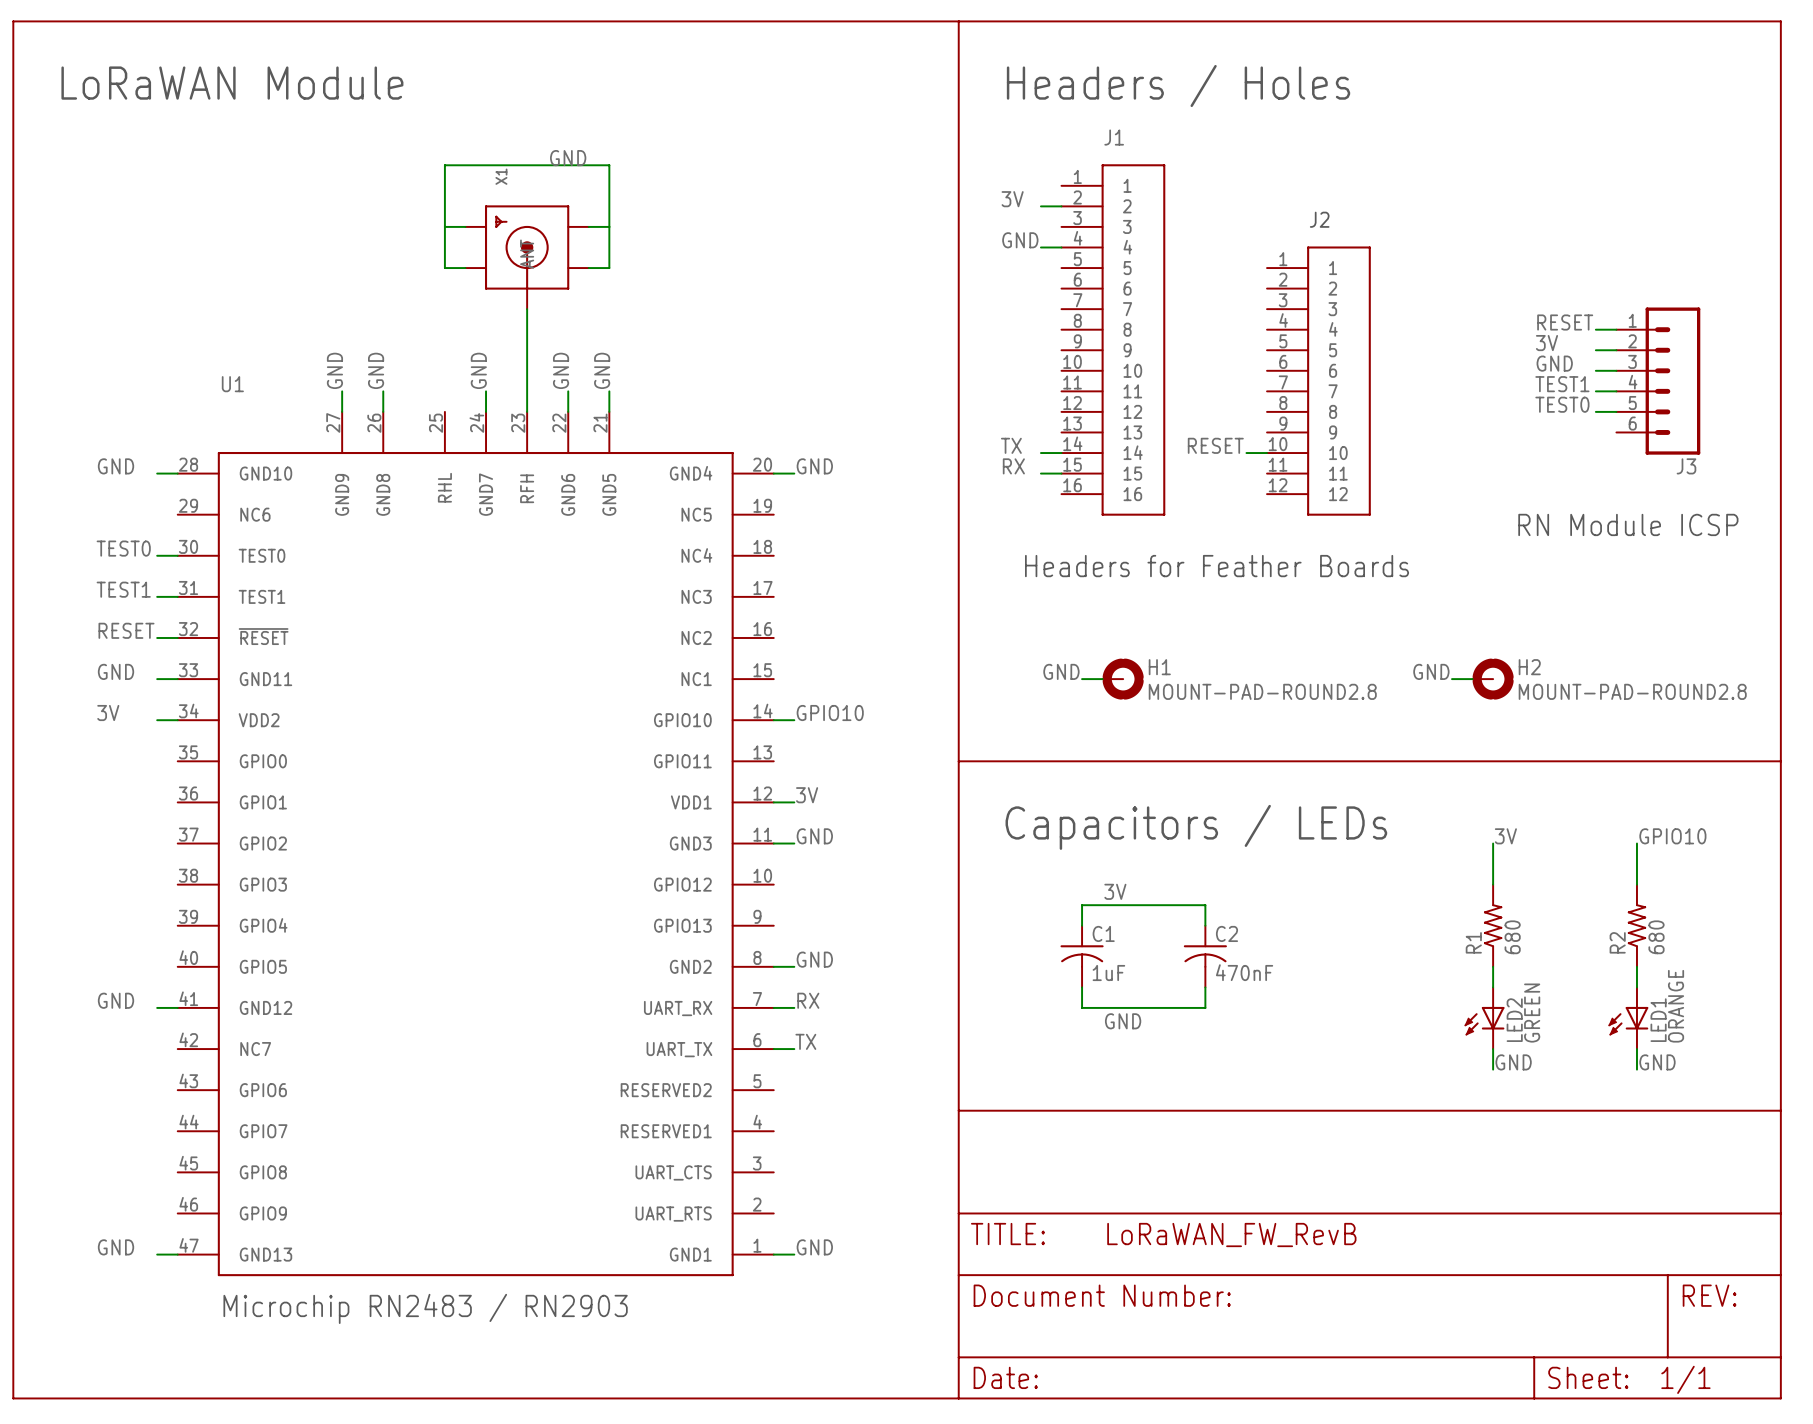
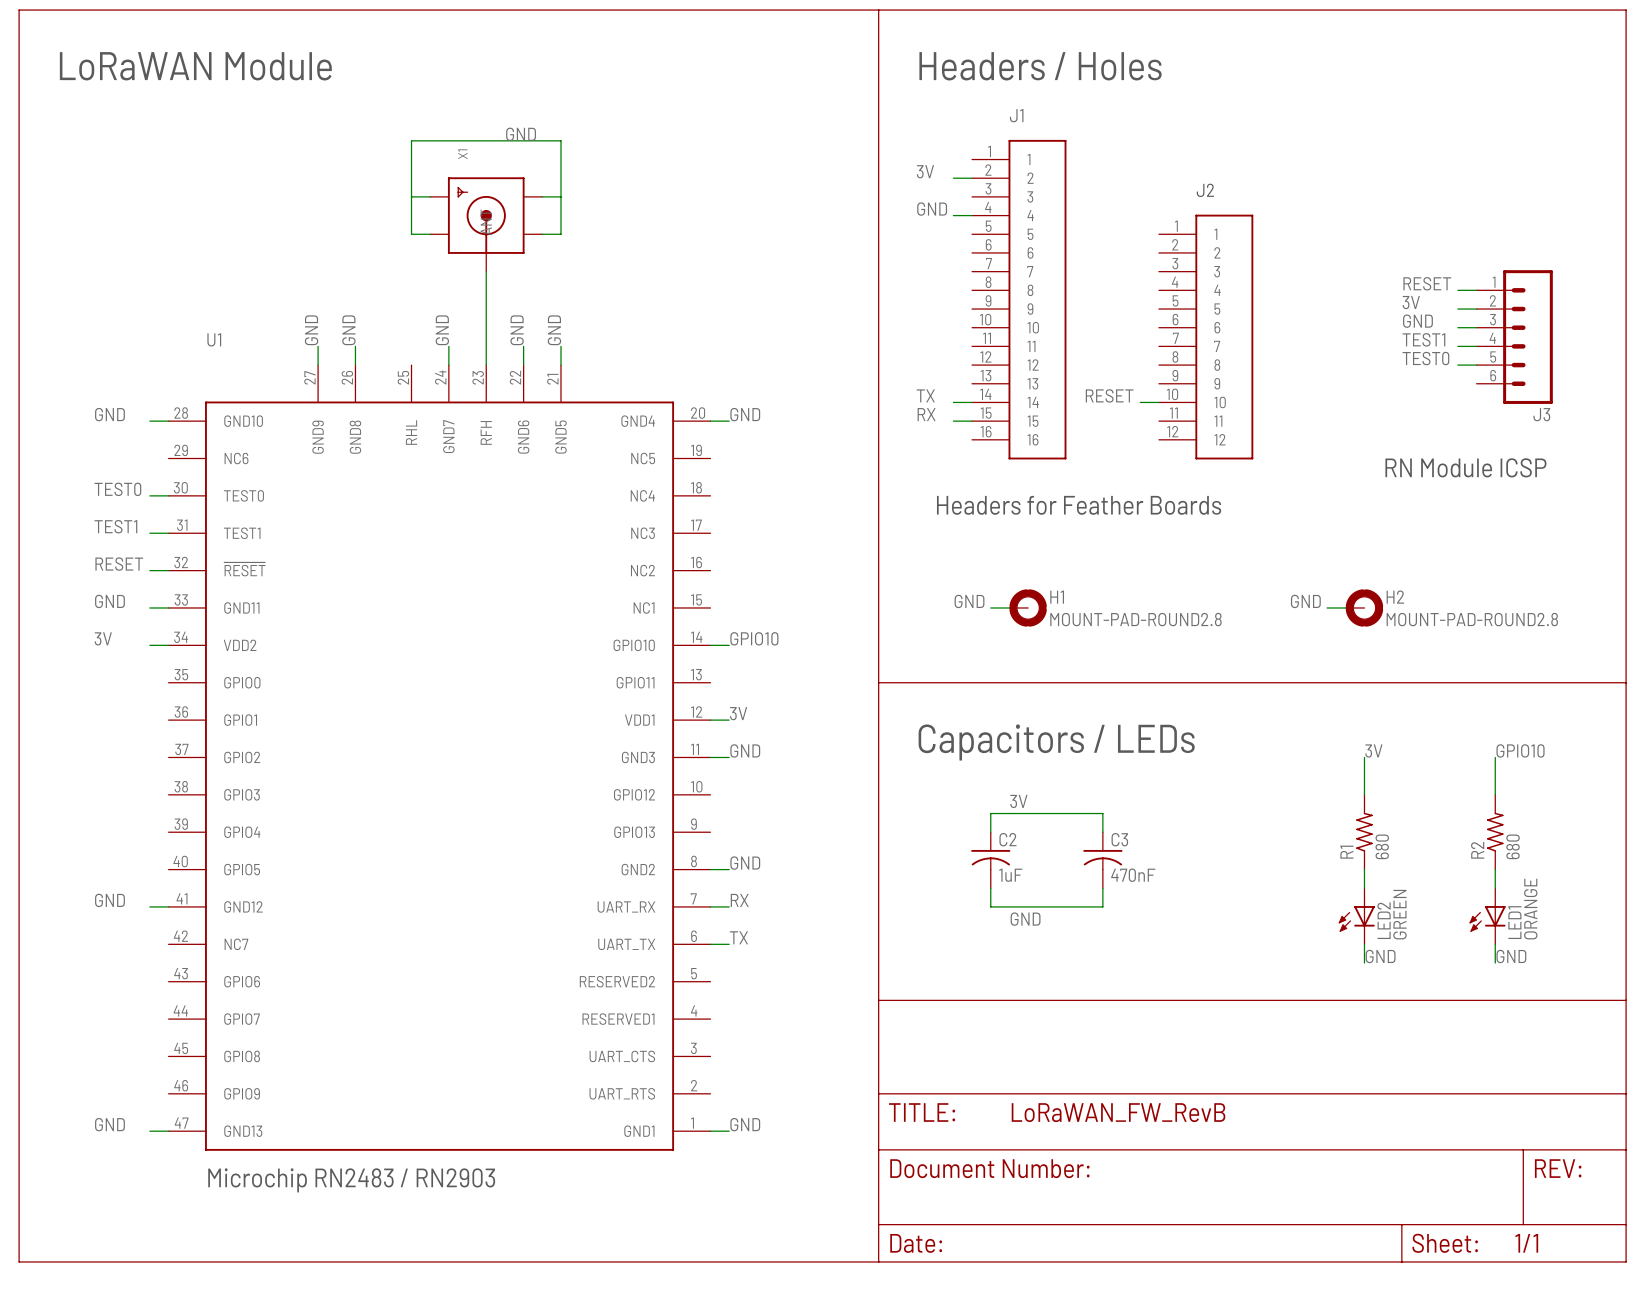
C1 name: C1 (1103, 933) -> C2 (1007, 839)
C2 name: C2 (1226, 933) -> C3 (1119, 839)

